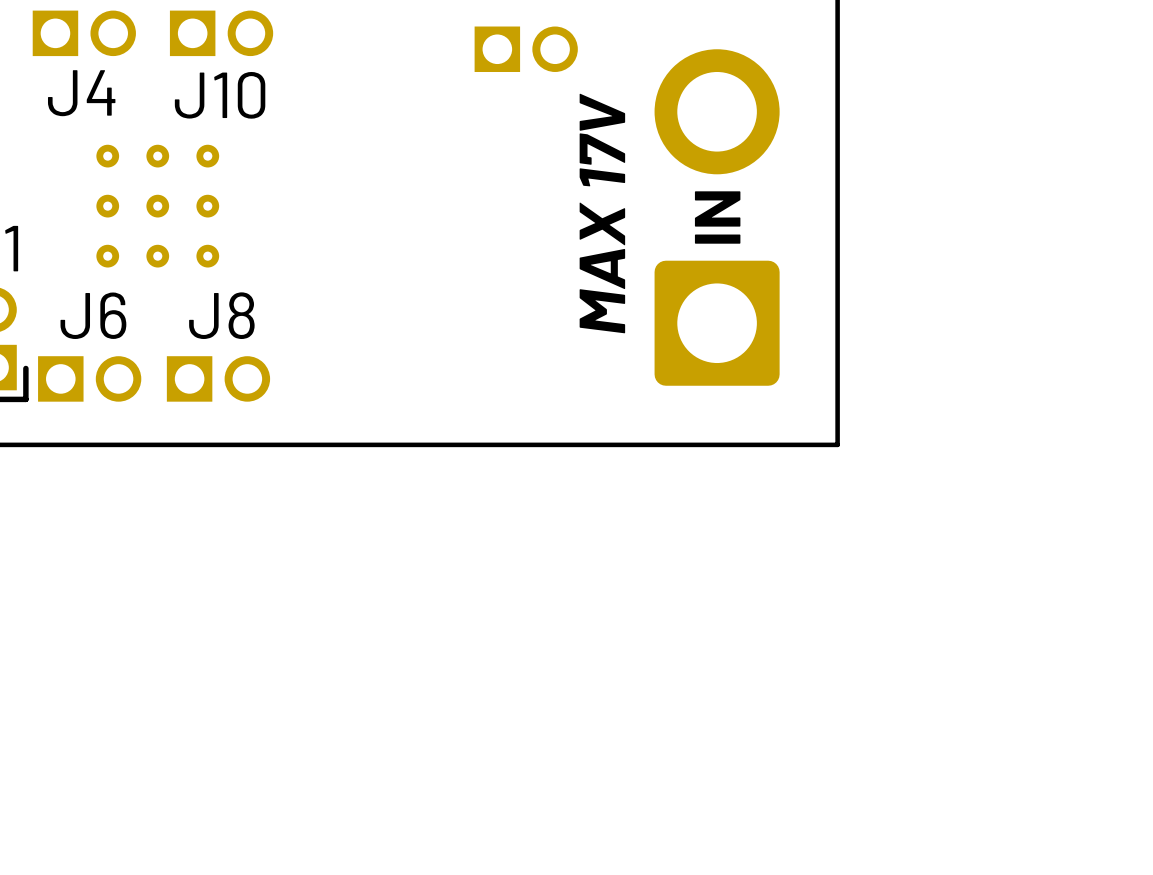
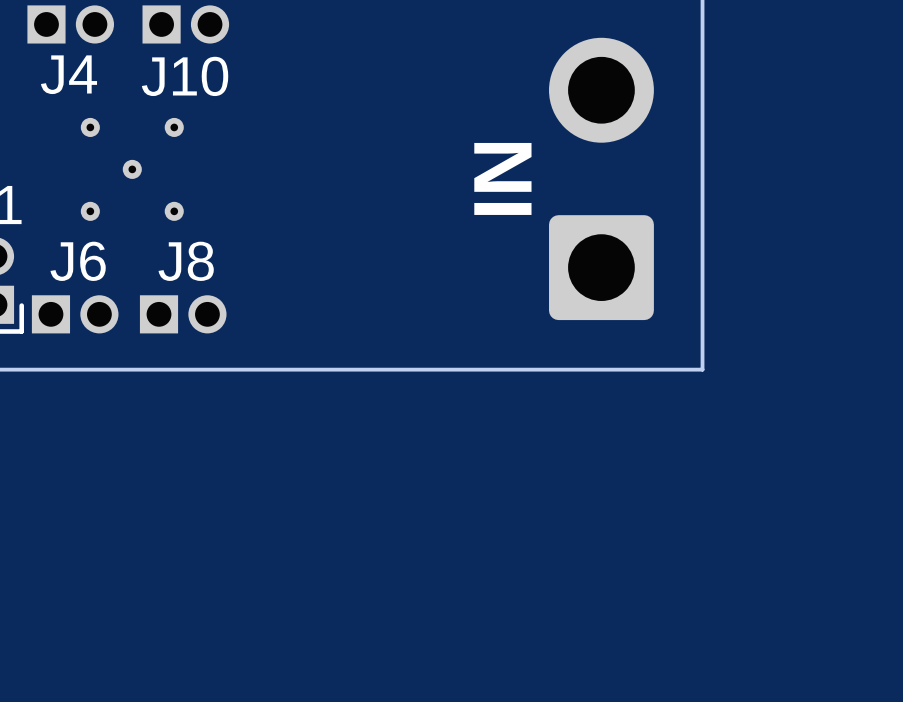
part: (526, 49) -> none
part footprint: [96, 144, 220, 268] -> [80, 117, 184, 221]
text: MAX 17V (602, 213) -> IN (502, 178)
text: IN (717, 217) -> none

